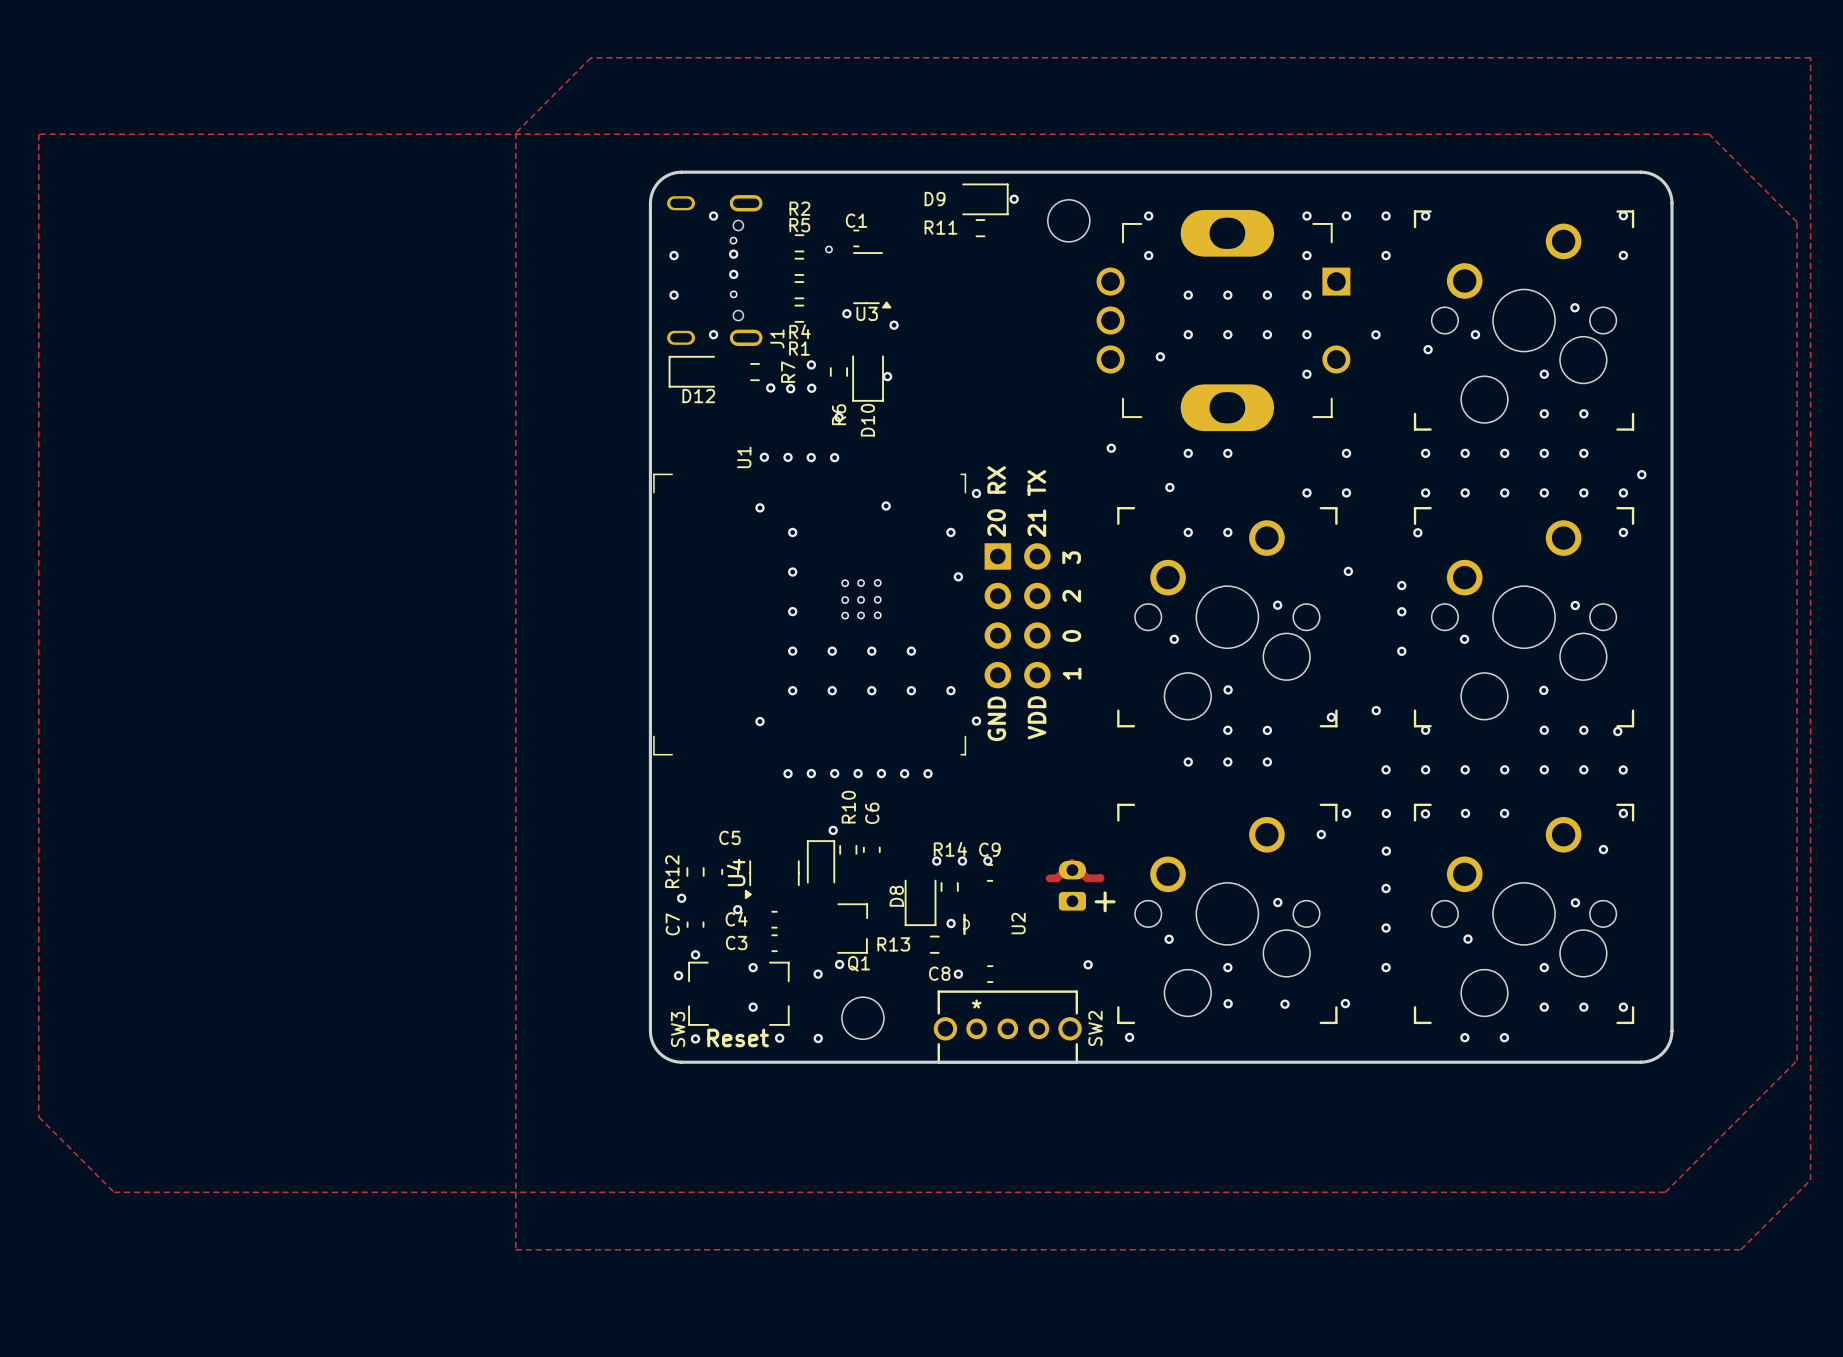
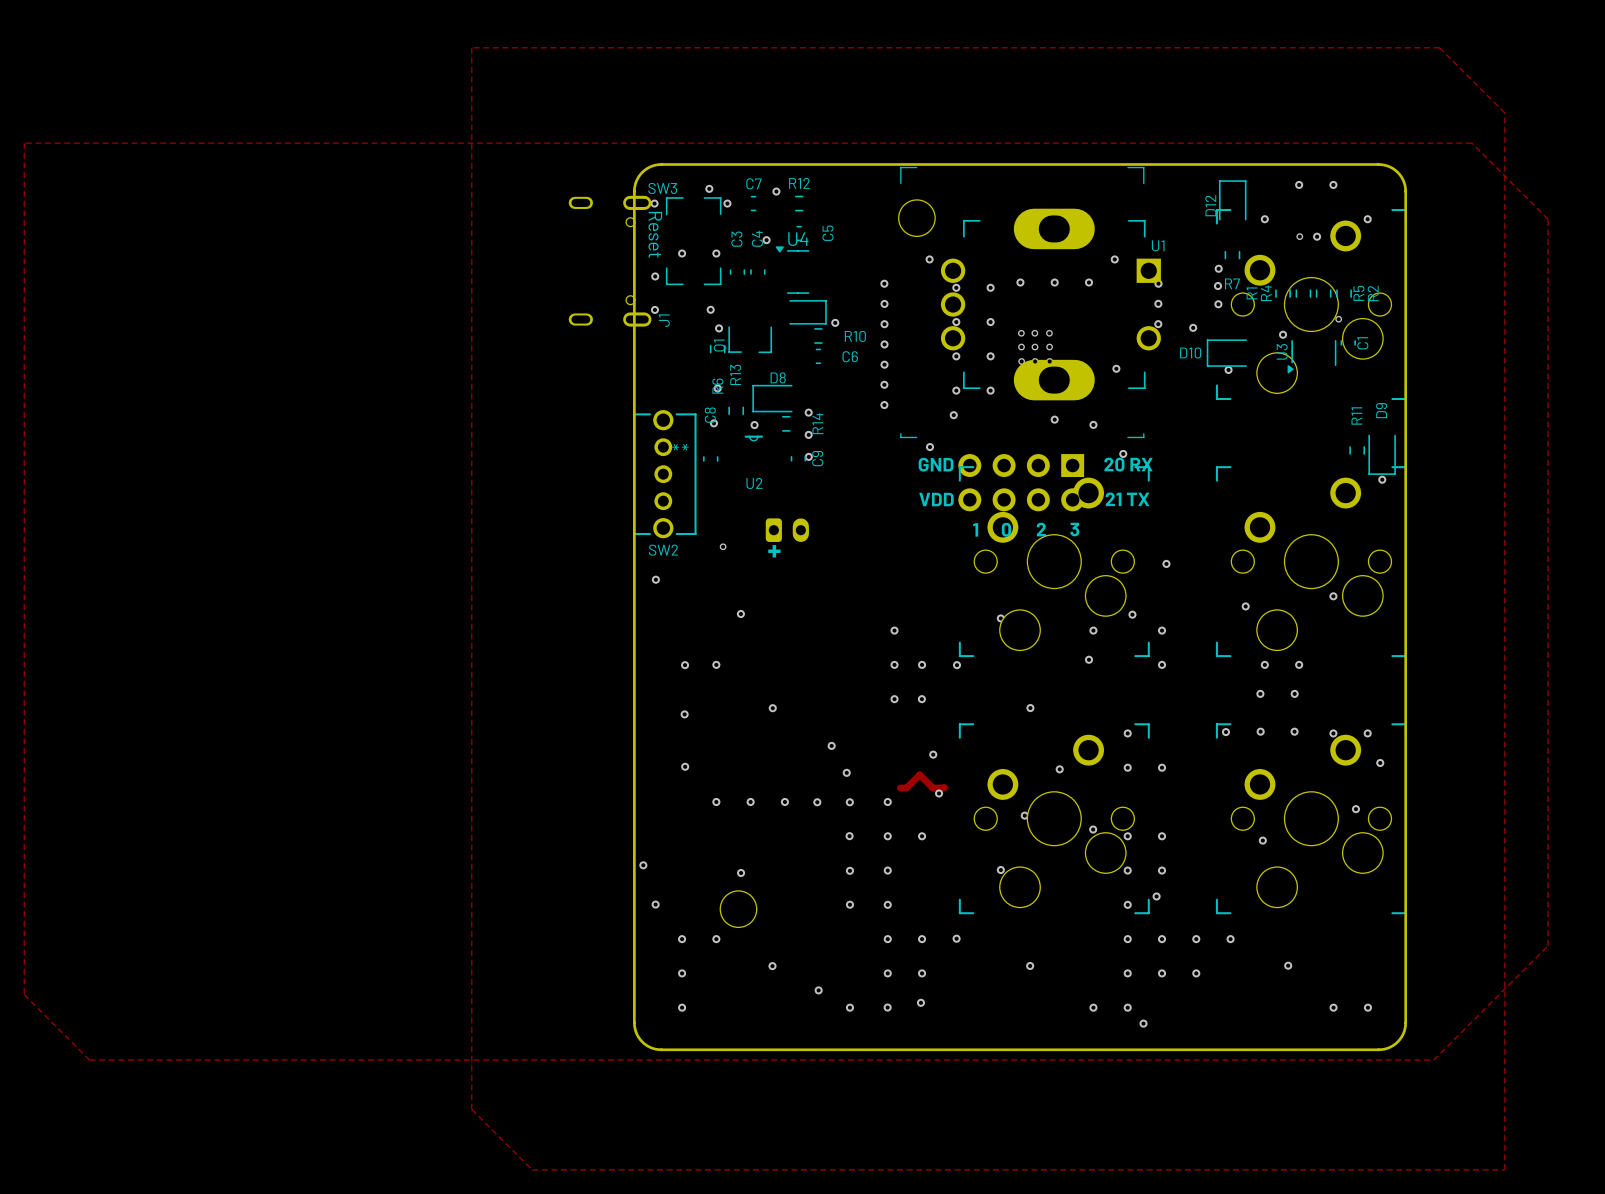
zone outline: (591, 57) (1810, 57) (1810, 1180) (1740, 1249) (515, 1249) (515, 133) (591, 57) -> (471, 47) (471, 1109) (532, 1169) (1504, 1169) (1504, 113) (1439, 47) (471, 47)
board edge: (681, 172) (1640, 172) (1651, 173) (1662, 181) (1668, 189) (1671, 203) (1671, 1031) (1668, 1044) (1662, 1053) (1654, 1059) (1640, 1062) (681, 1062) (668, 1059) (659, 1053) (653, 1044) (650, 1031) (650, 203) (653, 189) (659, 181) (671, 173) (681, 172) -> (661, 164) (649, 167) (642, 172) (635, 182) (634, 191) (634, 1022) (635, 1031) (640, 1039) (649, 1047) (661, 1049) (1378, 1049) (1387, 1048) (1395, 1043) (1403, 1034) (1405, 1022) (1405, 191) (1404, 182) (1399, 174) (1390, 167) (1378, 164) (661, 164)
via: none -> (1299, 184)
via: none -> (1333, 184)
via: none -> (709, 188)
via: none -> (776, 191)
D9 rotation: 0° (985, 199) -> 90° clockwise (1382, 454)
D9 position: (985, 199) -> (1382, 454)
via: (1014, 199) -> none
via: none -> (654, 203)
via: none -> (727, 203)
via: (1623, 215) -> none
via: (713, 216) -> none
via: (1148, 216) -> none
via: (1306, 216) -> none
via: (1346, 216) -> none
via: (1386, 216) -> none
via: (1425, 216) -> none
via: none -> (1264, 219)
via: none -> (1367, 219)
R11 rotation: 0° (980, 228) -> 90° clockwise (1357, 450)
R11 position: (980, 228) -> (1357, 450)
C1 rotation: 0° (856, 238) -> 90° clockwise (1348, 342)
C1 position: (856, 238) -> (1348, 342)
via: (733, 240) -> none
via: none -> (1299, 236)
via: none -> (1317, 236)
R2 rotation: 0° (799, 243) -> 90° clockwise (1344, 293)
R2 position: (799, 243) -> (1344, 293)
text: none -> Reset (655, 234)
via: none -> (766, 240)
via: (828, 249) -> none
via: (733, 254) -> none
via: (674, 255) -> none
via: (1148, 255) -> none
via: (1306, 255) -> none
via: (1386, 255) -> none
via: (1623, 255) -> none
via: none -> (682, 253)
via: none -> (716, 253)
R5 rotation: 0° (799, 266) -> 90° clockwise (1323, 293)
R5 position: (799, 266) -> (1323, 293)
via: none -> (929, 259)
via: none -> (1114, 259)
via: (733, 274) -> none
via: none -> (1218, 268)
U3 rotation: 0° (872, 280) -> 90° clockwise (1311, 356)
U3 position: (872, 280) -> (1311, 356)
via: none -> (655, 276)
R4 rotation: 0° (799, 290) -> 90° clockwise (1303, 293)
R4 position: (799, 290) -> (1303, 293)
via: (733, 294) -> none
via: (674, 295) -> none
via: (1306, 295) -> none
via: none -> (884, 283)
via: none -> (1158, 283)
via: none -> (1218, 286)
via: none -> (956, 287)
via: none -> (990, 287)
via: (1574, 307) -> none
R1 rotation: 0° (799, 313) -> 90° clockwise (1283, 293)
R1 position: (799, 313) -> (1283, 293)
via: (846, 313) -> none
via: none -> (884, 303)
via: none -> (1158, 303)
via: none -> (1218, 304)
via: (894, 325) -> none
via: none -> (654, 309)
via: none -> (710, 309)
part: none -> (808, 312)
via: (713, 334) -> none
via: (1188, 334) -> none
via: (1227, 334) -> none
via: (1267, 334) -> none
via: (1306, 334) -> none
via: (1375, 334) -> none
via: (1475, 334) -> none
via: none -> (1338, 319)
via: none -> (956, 322)
via: none -> (990, 322)
via: none -> (835, 322)
via: none -> (884, 324)
via: none -> (1158, 324)
via: none -> (1193, 327)
via: none -> (719, 328)
via: (1428, 349) -> none
via: none -> (1021, 333)
via: none -> (1034, 333)
via: none -> (1049, 333)
via: none -> (1283, 334)
via: (1160, 356) -> none
via: (811, 364) -> none
via: none -> (884, 344)
via: none -> (1021, 347)
via: none -> (1035, 347)
via: none -> (1049, 347)
D12 rotation: 0° (691, 371) -> 90° clockwise (1232, 200)
D12 position: (691, 371) -> (1232, 200)
R7 rotation: 0° (755, 372) -> 90° clockwise (1232, 255)
R7 position: (755, 372) -> (1232, 255)
via position: (1306, 374) -> (1116, 368)
via: (1544, 374) -> none
via: (887, 376) -> none
D10 rotation: 0° (868, 378) -> 90° clockwise (1226, 353)
D10 position: (868, 378) -> (1226, 353)
via: none -> (956, 356)
via: none -> (990, 356)
via: none -> (1021, 361)
via: none -> (1035, 361)
via: none -> (1049, 361)
via: (770, 387) -> none
via: (790, 388) -> none
via: (811, 388) -> none
via: none -> (884, 364)
via: none -> (1228, 369)
via: none -> (884, 384)
via: (1544, 413) -> none
via: (1583, 413) -> none
via: none -> (956, 390)
via: none -> (990, 390)
via: none -> (884, 405)
via: none -> (808, 412)
via: (1188, 453) -> none
via: (1346, 453) -> none
via: (1425, 453) -> none
via: (1465, 453) -> none
via: (1504, 453) -> none
via: (1544, 453) -> none
via: (1583, 453) -> none
via: (764, 457) -> none
via: (788, 457) -> none
via: (811, 457) -> none
via: none -> (754, 425)
via: none -> (1093, 424)
via: none -> (808, 434)
via: (1641, 474) -> none
via: none -> (930, 447)
via: (1169, 487) -> none
via: (1346, 492) -> none
via: (1425, 492) -> none
via: (1465, 492) -> none
via: (1504, 492) -> none
via: (1544, 492) -> none
via: (1583, 492) -> none
via: (1623, 492) -> none
via: (976, 493) -> none
via: none -> (808, 456)
text rotation: 0° (996, 501) -> 90° clockwise (1128, 464)
text position: 20 RX (996, 501) -> 20 RX (1128, 464)
text rotation: 0° (1036, 503) -> 90° clockwise (1127, 499)
text position: 21 TX (1036, 503) -> 21 TX (1127, 499)
via: (886, 506) -> none
via: (759, 507) -> none
via: none -> (1382, 479)
via: (792, 532) -> none
via: (950, 532) -> none
via: (1188, 532) -> none
via: (1227, 532) -> none
via: (1417, 532) -> none
via: (1623, 532) -> none
text rotation: 0° (1071, 557) -> 90° clockwise (1074, 529)
text position: 3 (1071, 557) -> 3 (1074, 529)
via: (1348, 571) -> none
via: (792, 572) -> none
via: (958, 576) -> none
via: (877, 582) -> none
via: (845, 583) -> none
via: (861, 583) -> none
via: (1401, 585) -> none
text rotation: 0° (1071, 596) -> 90° clockwise (1041, 529)
text position: 2 (1071, 596) -> 2 (1041, 529)
via: (861, 599) -> none
via: (877, 599) -> none
via: (1277, 605) -> none
via: (1575, 605) -> none
via: (792, 611) -> none
via: (1401, 611) -> none
U1 rotation: 0° (809, 614) -> 90° clockwise (1022, 302)
U1 position: (809, 614) -> (1022, 302)
via: (845, 615) -> none
via: (861, 615) -> none
via: (877, 615) -> none
part rotation: 0° (1017, 615) -> 90° clockwise (1021, 482)
part position: (1017, 615) -> (1021, 482)
via: none -> (1166, 563)
text rotation: 0° (1071, 636) -> 90° clockwise (1006, 529)
text position: 0 (1071, 636) -> 0 (1006, 529)
via: none -> (655, 579)
via: (1174, 639) -> none
via: (1464, 639) -> none
via: (792, 651) -> none
via: (832, 651) -> none
via: (871, 651) -> none
via: (911, 651) -> none
via: (1401, 651) -> none
via: none -> (1333, 596)
via: none -> (1245, 606)
text rotation: 0° (1072, 673) -> 90° clockwise (975, 529)
text position: 1 (1072, 673) -> 1 (975, 529)
via: none -> (740, 613)
via: none -> (1132, 614)
via: none -> (1000, 618)
via: (1228, 689) -> none
via: (792, 690) -> none
via: (832, 690) -> none
via: (871, 690) -> none
via: (911, 690) -> none
via: (950, 690) -> none
via: (1543, 690) -> none
via: none -> (894, 630)
via: none -> (1093, 630)
via: none -> (1162, 630)
via: (1376, 710) -> none
text rotation: 0° (1037, 717) -> 90° clockwise (936, 499)
text position: VDD (1037, 717) -> VDD (936, 499)
via: (1331, 717) -> none
text rotation: 0° (996, 718) -> 90° clockwise (936, 464)
text position: GND (996, 718) -> GND (936, 464)
via: (759, 721) -> none
via: (976, 721) -> none
via: (1227, 730) -> none
via: (1425, 730) -> none
via: (1544, 730) -> none
via: (1583, 730) -> none
via: (1617, 731) -> none
via: none -> (685, 665)
via: none -> (716, 664)
via: none -> (894, 664)
via: none -> (922, 664)
via: none -> (956, 665)
via: none -> (1162, 664)
via: none -> (1264, 664)
via: none -> (1299, 664)
via: (1188, 762) -> none
via: (1227, 762) -> none
via: (1267, 762) -> none
via: (1386, 769) -> none
via: (1425, 769) -> none
via: (1544, 769) -> none
via: (1583, 769) -> none
via: (1623, 769) -> none
via: (788, 773) -> none
via: (811, 773) -> none
via: (834, 773) -> none
via: (858, 773) -> none
via: (881, 773) -> none
via: (904, 773) -> none
via: (927, 773) -> none
via: none -> (894, 699)
via: none -> (921, 699)
via: none -> (772, 708)
via: none -> (1030, 708)
via: none -> (684, 714)
via: (1346, 813) -> none
via: (1386, 813) -> none
via: (1623, 813) -> none
via: none -> (1127, 733)
via: none -> (1333, 733)
via: none -> (1367, 733)
via: none -> (831, 745)
via: (833, 830) -> none
via: (1321, 834) -> none
via: none -> (933, 754)
R10 rotation: 0° (848, 849) -> 90° clockwise (818, 335)
R10 position: (848, 849) -> (818, 335)
C6 rotation: 0° (871, 849) -> 90° clockwise (818, 356)
C6 position: (871, 849) -> (818, 356)
via: (1386, 851) -> none
via: none -> (685, 766)
via: none -> (1127, 767)
via: none -> (1162, 767)
via: none -> (1059, 769)
part: (821, 861) -> none
via: (936, 861) -> none
via: (962, 861) -> none
R12 rotation: 0° (695, 871) -> 90° clockwise (799, 203)
R12 position: (695, 871) -> (799, 203)
C5 rotation: 0° (730, 872) -> 90° clockwise (799, 233)
C5 position: (730, 872) -> (799, 233)
C9 rotation: 0° (989, 872) -> 90° clockwise (798, 458)
C9 position: (989, 872) -> (798, 458)
U4 rotation: 0° (772, 879) -> 90° clockwise (792, 270)
U4 position: (772, 879) -> (792, 270)
via: none -> (939, 793)
part rotation: 0° (1072, 885) -> 90° clockwise (787, 530)
part position: (1072, 885) -> (787, 530)
R14 rotation: 0° (949, 886) -> 90° clockwise (786, 423)
R14 position: (949, 886) -> (786, 423)
via: (1386, 888) -> none
via: none -> (716, 801)
via: none -> (750, 801)
via: none -> (784, 801)
via: none -> (817, 802)
via: none -> (849, 802)
via: none -> (887, 801)
via: (681, 898) -> none
text rotation: 0° (1105, 901) -> 90° clockwise (774, 551)
text position: + (1105, 901) -> + (774, 551)
D8 rotation: 0° (920, 902) -> 90° clockwise (772, 398)
D8 position: (920, 902) -> (772, 398)
via: (1277, 902) -> none
via: (737, 909) -> none
via: none -> (1024, 815)
C4 rotation: 0° (774, 919) -> 90° clockwise (757, 271)
C4 position: (774, 919) -> (757, 271)
via: (951, 923) -> none
C7 rotation: 0° (695, 924) -> 90° clockwise (753, 203)
C7 position: (695, 924) -> (753, 203)
U2 rotation: 0° (966, 924) -> 90° clockwise (753, 438)
U2 position: (966, 924) -> (753, 438)
via: none -> (1093, 829)
Q1 rotation: 0° (852, 928) -> 90° clockwise (750, 339)
Q1 position: (852, 928) -> (750, 339)
via: (1386, 928) -> none
via: none -> (849, 836)
via: none -> (887, 836)
via: none -> (922, 836)
via: none -> (1127, 836)
via: none -> (1162, 836)
via: (1169, 939) -> none
C3 rotation: 0° (774, 943) -> 90° clockwise (737, 272)
C3 position: (774, 943) -> (737, 272)
R13 rotation: 0° (934, 944) -> 90° clockwise (736, 410)
R13 position: (934, 944) -> (736, 410)
via: (695, 954) -> none
via: (839, 964) -> none
via: (1088, 964) -> none
via: (1227, 967) -> none
via: (1386, 967) -> none
via: (1544, 967) -> none
via: none -> (849, 870)
via: none -> (887, 870)
via: none -> (1000, 870)
via: none -> (1127, 870)
via: none -> (1162, 870)
via: (818, 974) -> none
via: (958, 974) -> none
C8 rotation: 0° (990, 974) -> 90° clockwise (710, 458)
C8 position: (990, 974) -> (710, 458)
via: (678, 975) -> none
via: none -> (741, 873)
SW3 rotation: 0° (738, 993) -> 90° clockwise (693, 241)
SW3 position: (738, 993) -> (693, 241)
via: (1228, 1003) -> none
via: (1284, 1004) -> none
via: (753, 1007) -> none
via: (1544, 1007) -> none
via: (1583, 1007) -> none
via: (1623, 1007) -> none
via: none -> (655, 904)
via: none -> (849, 904)
via: none -> (887, 904)
via: none -> (1127, 904)
SW2 rotation: 0° (1007, 1027) -> 90° clockwise (664, 474)
SW2 position: (1007, 1027) -> (664, 474)
text: Reset (738, 1037) -> none
via position: (1129, 1037) -> (956, 938)
via: (1464, 1037) -> none
via: (1504, 1037) -> none
via: (695, 1038) -> none
via: (779, 1038) -> none
via: (818, 1038) -> none
via: none -> (682, 939)
via: none -> (716, 939)
via: none -> (887, 939)
via: none -> (922, 939)
via: none -> (1127, 939)
via: none -> (1162, 939)
via: none -> (1196, 939)
via: none -> (1230, 939)
via: none -> (772, 966)
via: none -> (1030, 965)
via: none -> (1288, 965)
via: none -> (682, 973)
via: none -> (887, 973)
via: none -> (922, 973)
via: none -> (1127, 973)
via: none -> (1162, 973)
via: none -> (1196, 973)
via: none -> (818, 990)
via: none -> (920, 1002)
via: none -> (682, 1007)
via: none -> (849, 1007)
via: none -> (887, 1007)
via: none -> (1093, 1007)
via: none -> (1127, 1007)
via: none -> (1333, 1007)
via: none -> (1367, 1007)
via: none -> (1143, 1023)

